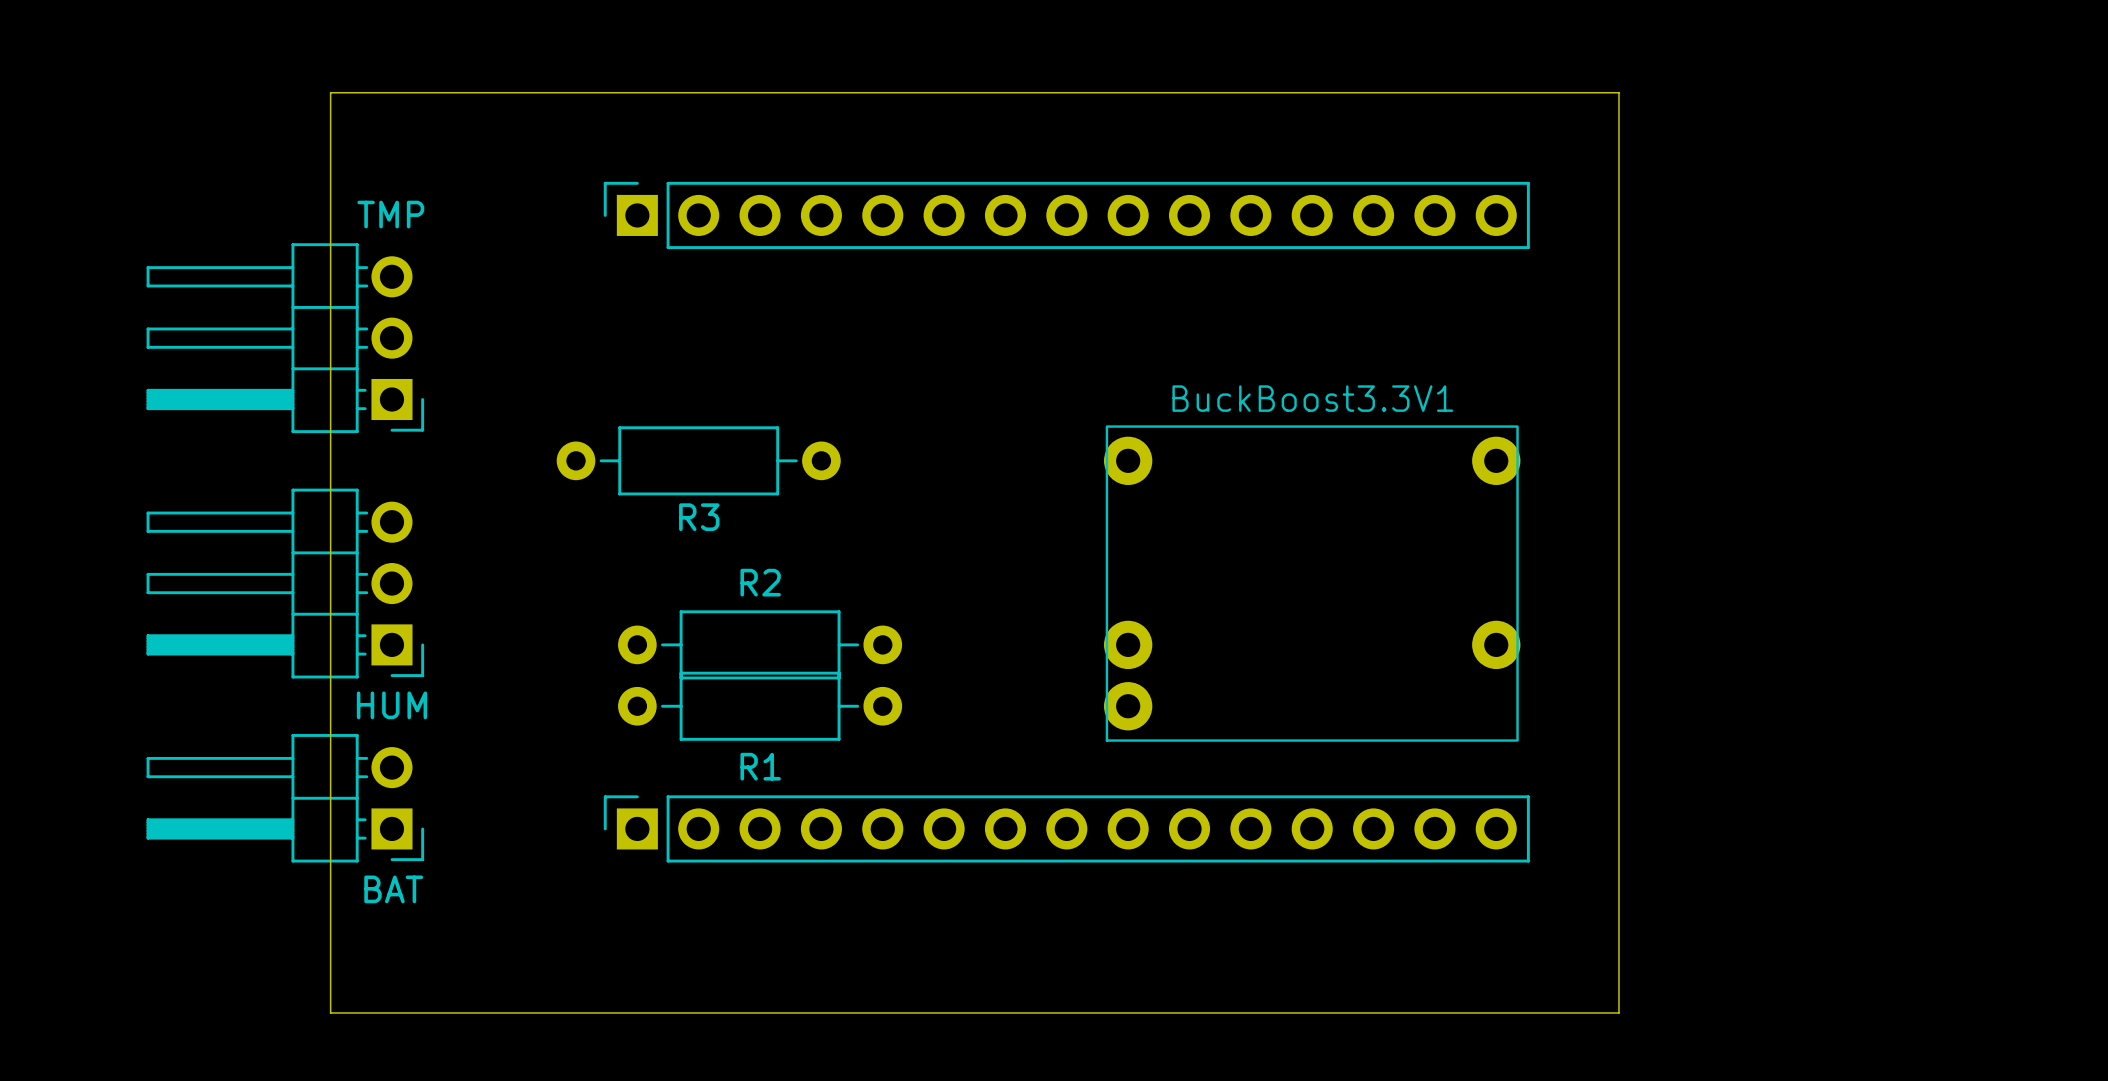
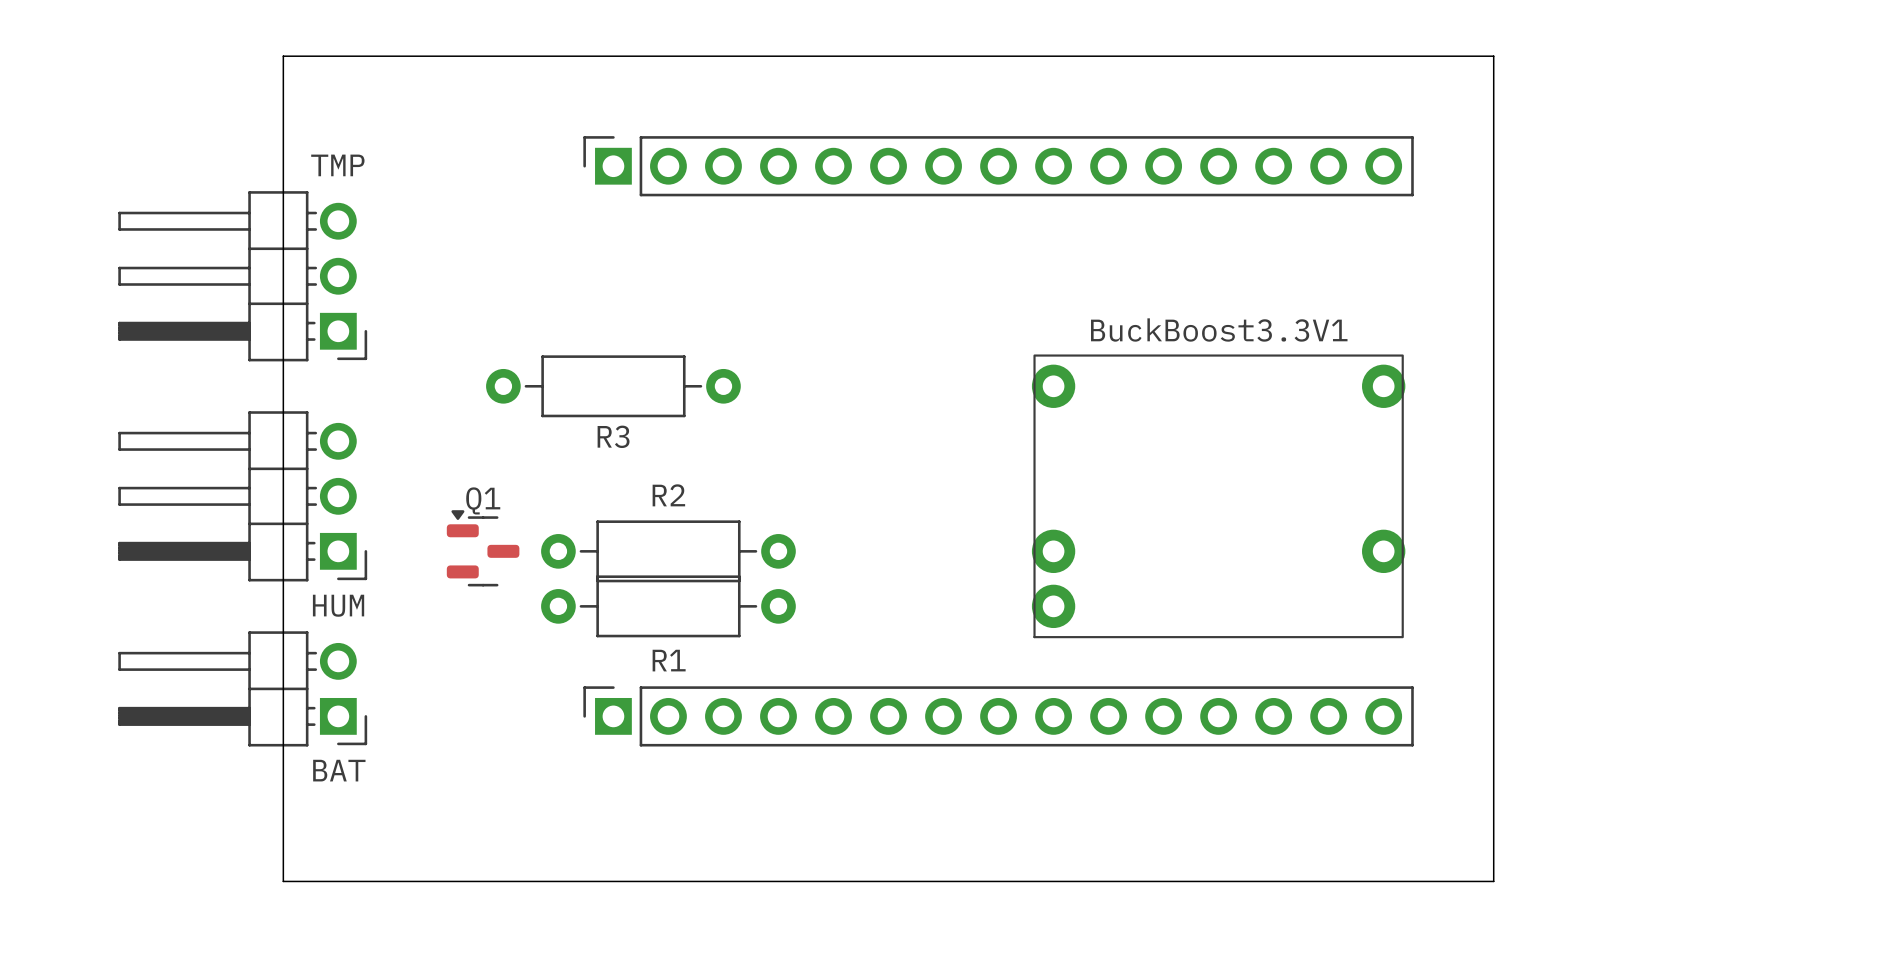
board edge: (1618, 92) (1618, 1012) -> (1438, 56) (1493, 56) (1493, 881) (1438, 881)
part position: (1066, 215) -> (998, 166)
BuckBoost3.3V1 position: (1312, 583) -> (1218, 496)
Q1: none -> (483, 548)
part position: (1066, 828) -> (998, 716)

